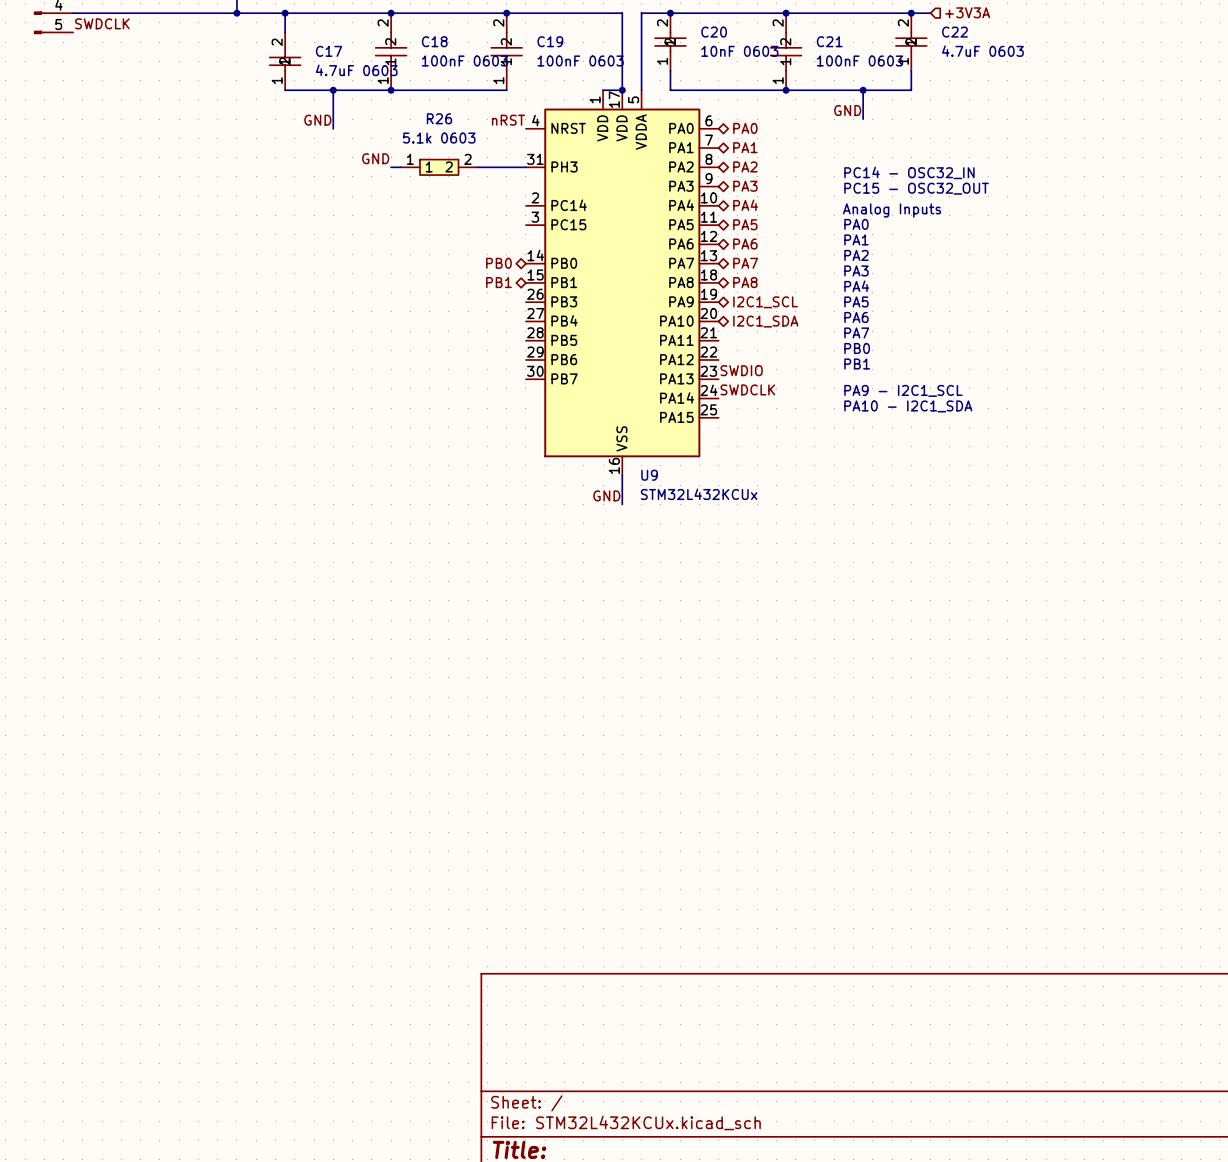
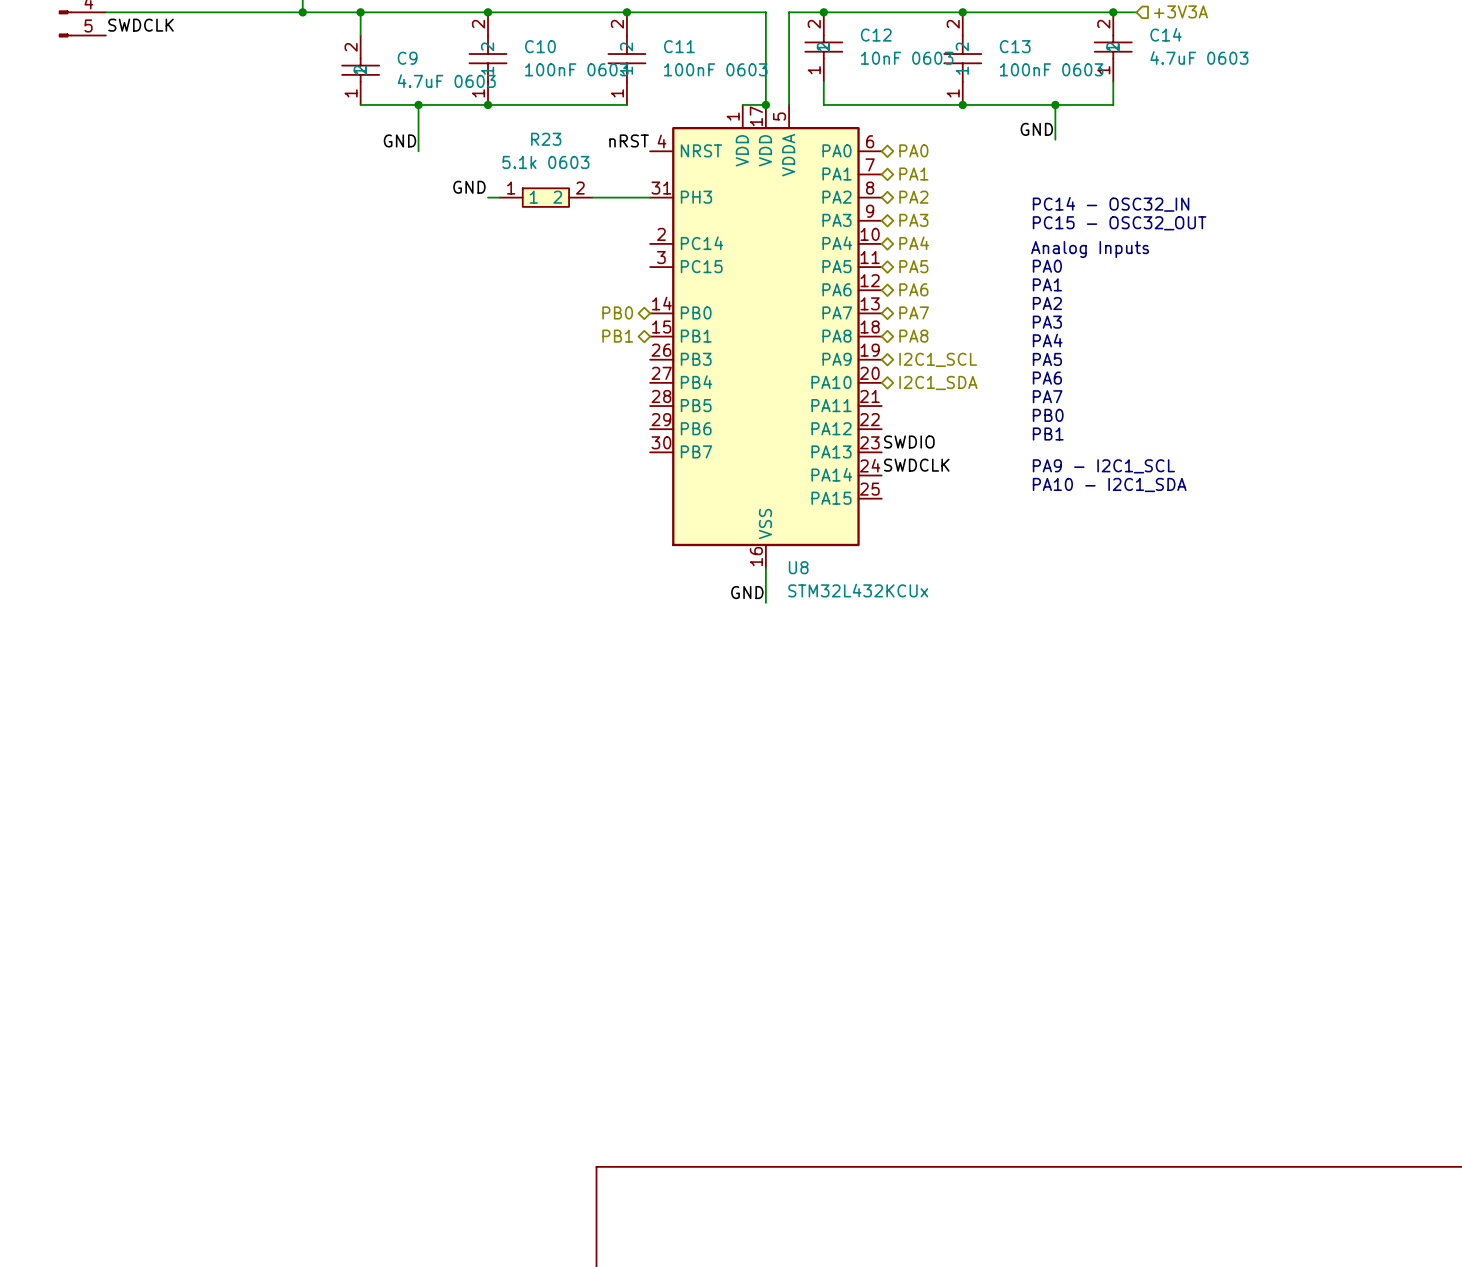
C20 name: C20 (714, 32) -> C12 (876, 35)
C22 name: C22 (954, 32) -> C14 (1166, 34)
C18 name: C18 (434, 41) -> C10 (540, 46)
C19 name: C19 (550, 41) -> C11 (679, 46)
C21 name: C21 (829, 41) -> C13 (1015, 46)
C17 name: C17 (329, 51) -> C9 (407, 58)
R26 name: R26 (439, 118) -> R23 (546, 139)
U9 name: U9 (649, 475) -> U8 (798, 567)

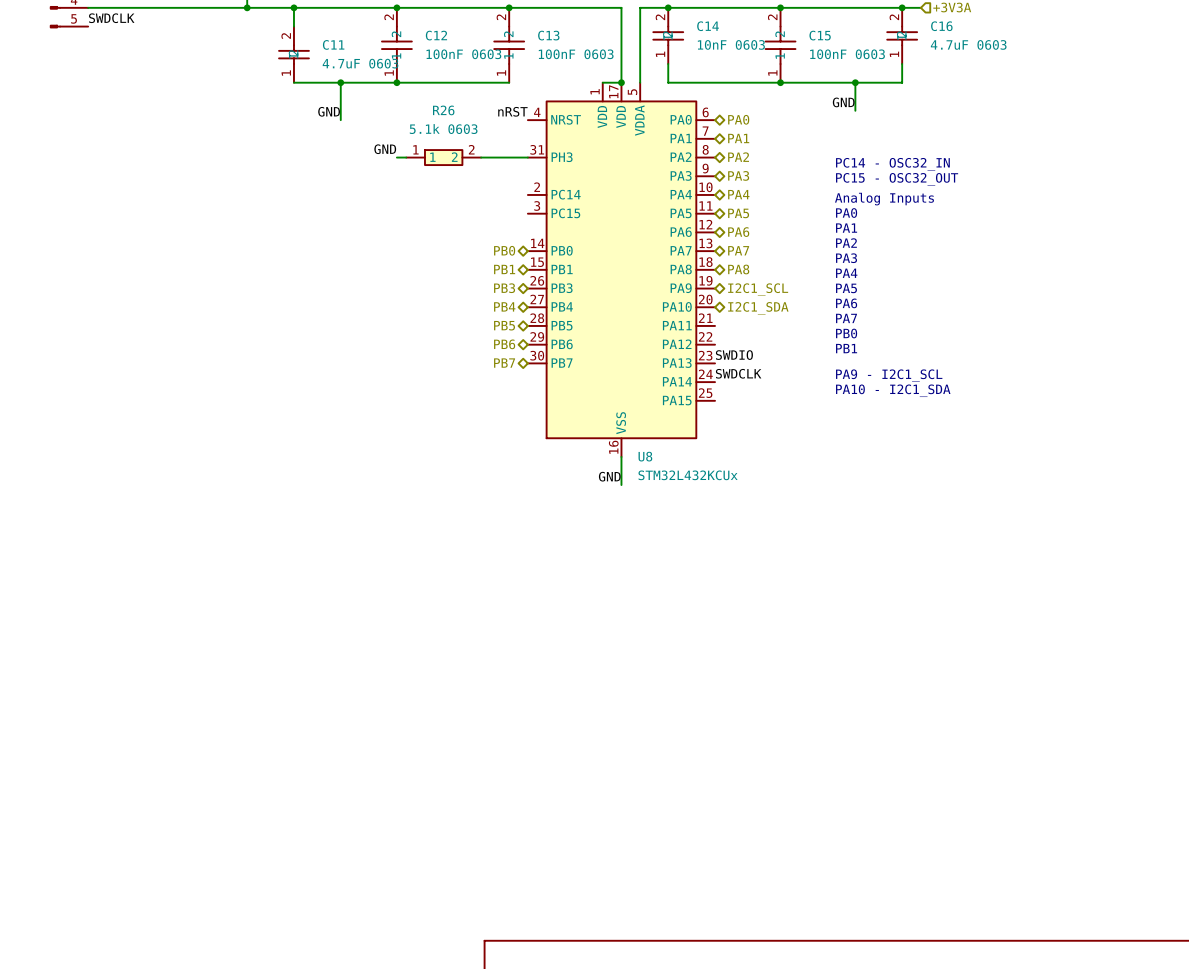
C14 name: C14 (1166, 34) -> C16 (941, 26)
C12 name: C12 (876, 35) -> C14 (708, 26)
C10 name: C10 (540, 46) -> C12 (436, 35)
C11 name: C11 (679, 46) -> C13 (548, 35)
C13 name: C13 (1015, 46) -> C15 (820, 35)
C9 name: C9 (407, 58) -> C11 (333, 44)
R23 name: R23 (546, 139) -> R26 (443, 110)
hierarchical label: none -> PB3 (504, 288)
hierarchical label: none -> PB4 (504, 306)
hierarchical label: none -> PB5 (504, 325)
hierarchical label: none -> PB6 (504, 344)
hierarchical label: none -> PB7 (504, 363)

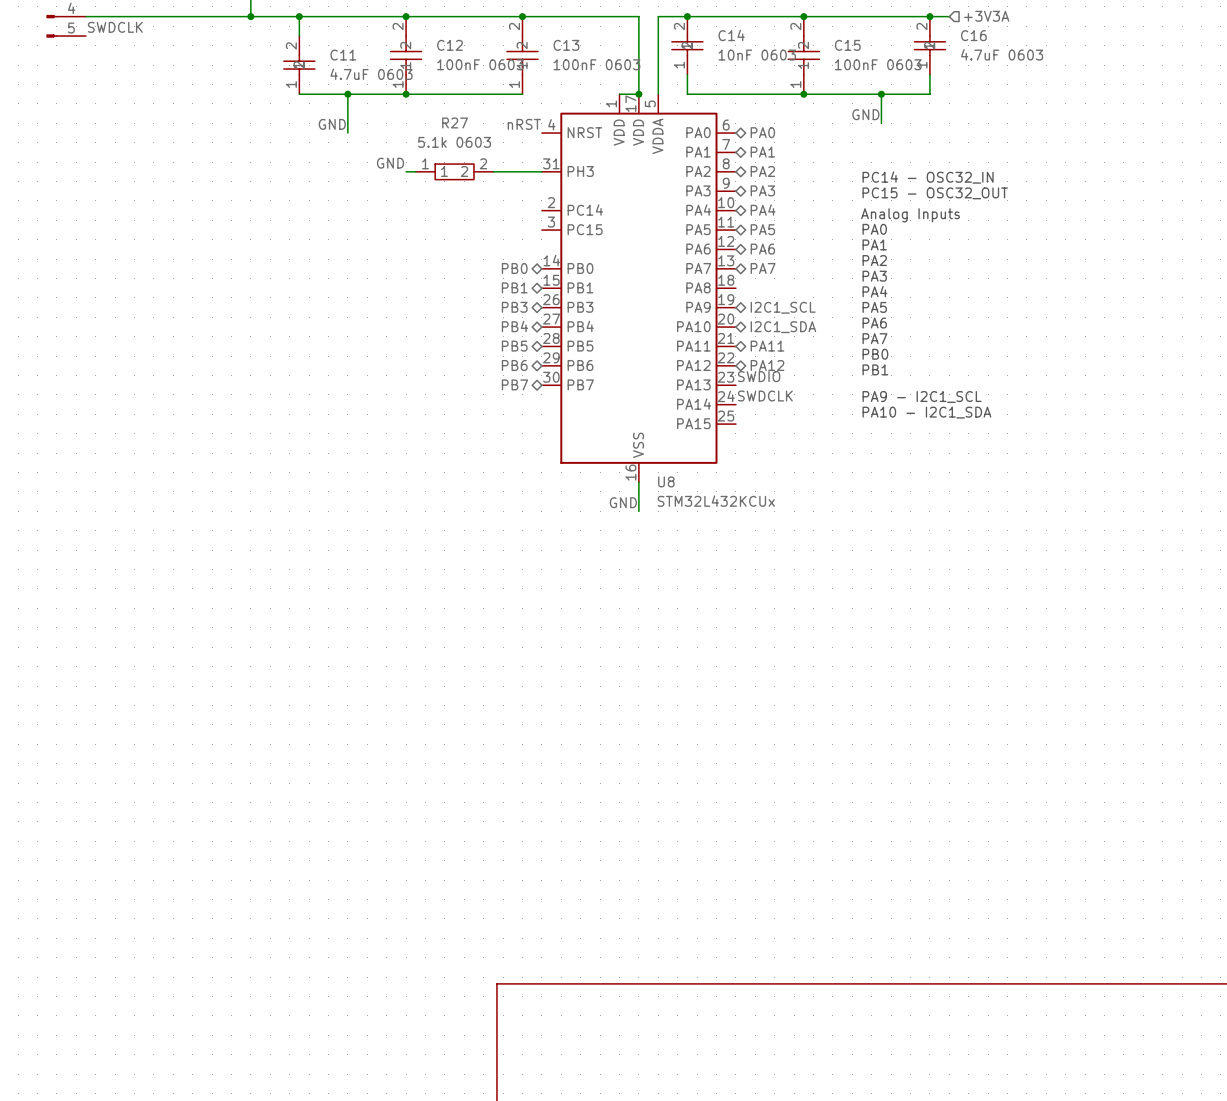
R26 name: R26 (443, 110) -> R27 (455, 122)
hierarchical label: PA8 (738, 269) -> none
hierarchical label: none -> PA11 (767, 346)
hierarchical label: none -> PA12 (767, 365)

